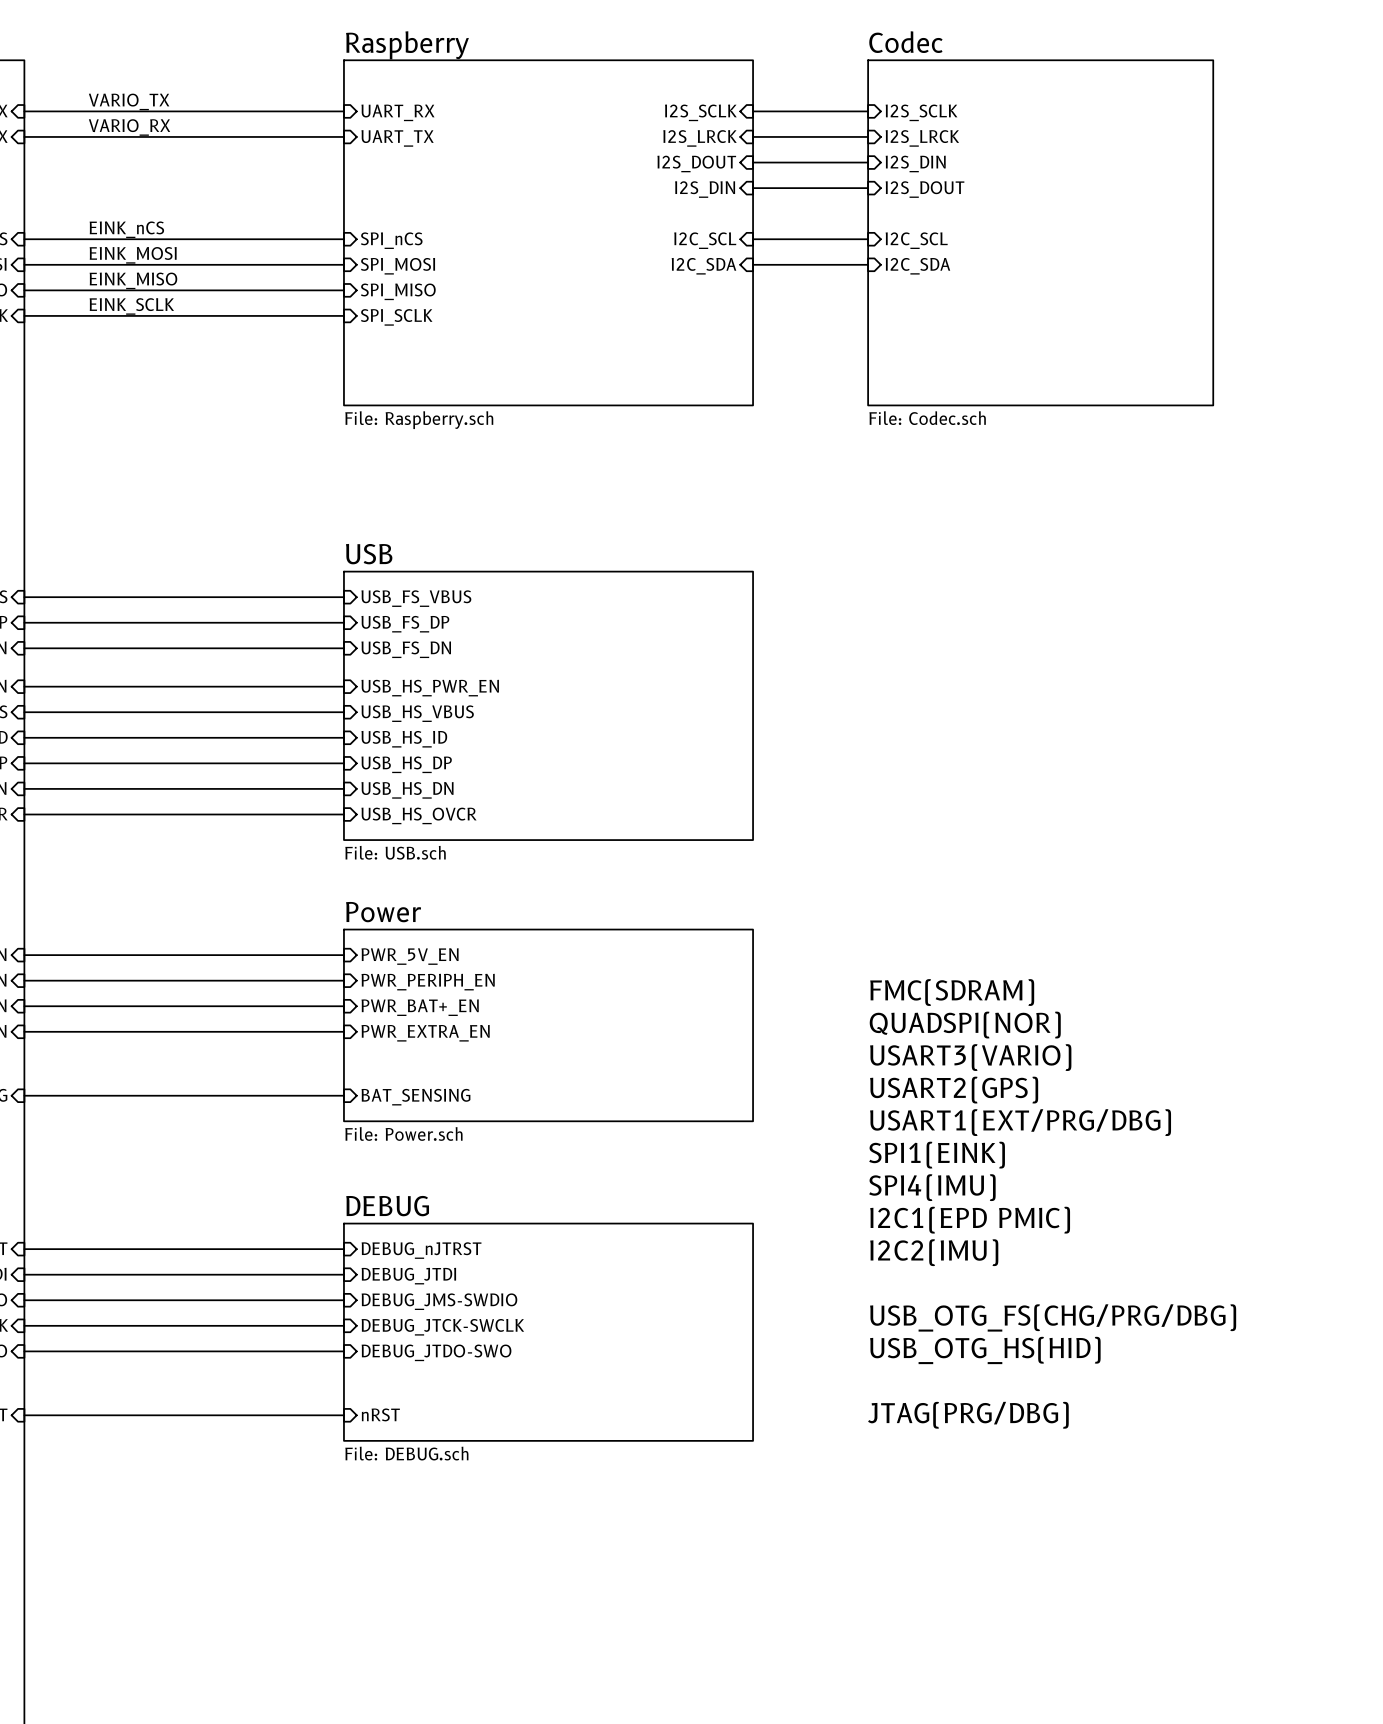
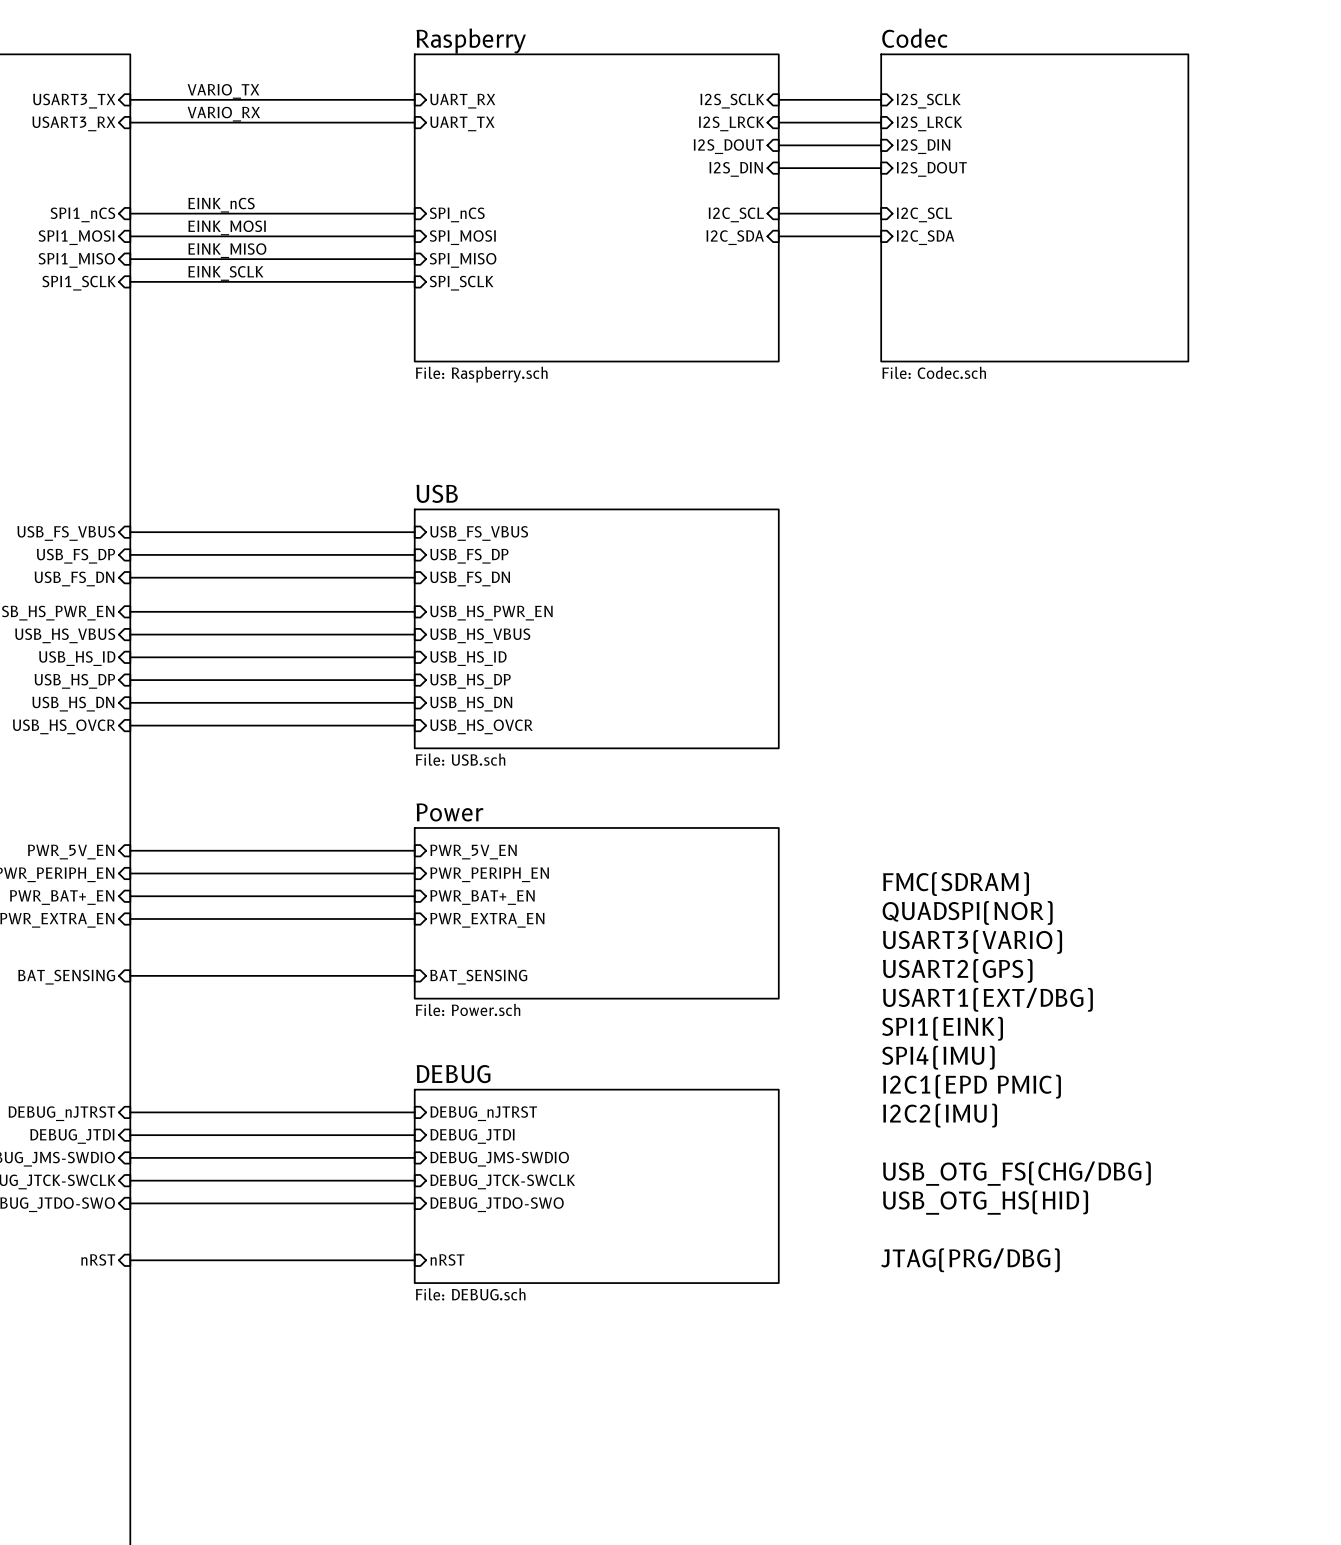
text: USART1(EXT/PRG/DBG) (1020, 1122) -> USART1(EXT/DBG) (987, 999)
text: USB_OTG_FS(CHG/PRG/DBG) (1053, 1317) -> USB_OTG_FS(CHG/DBG) (1016, 1173)

